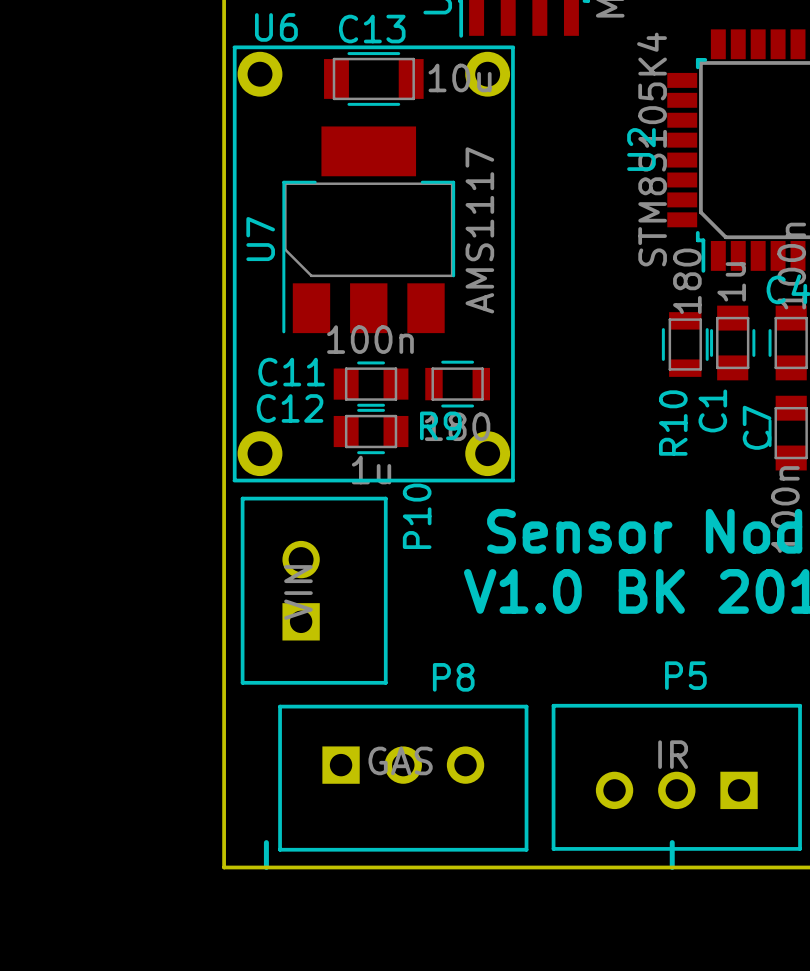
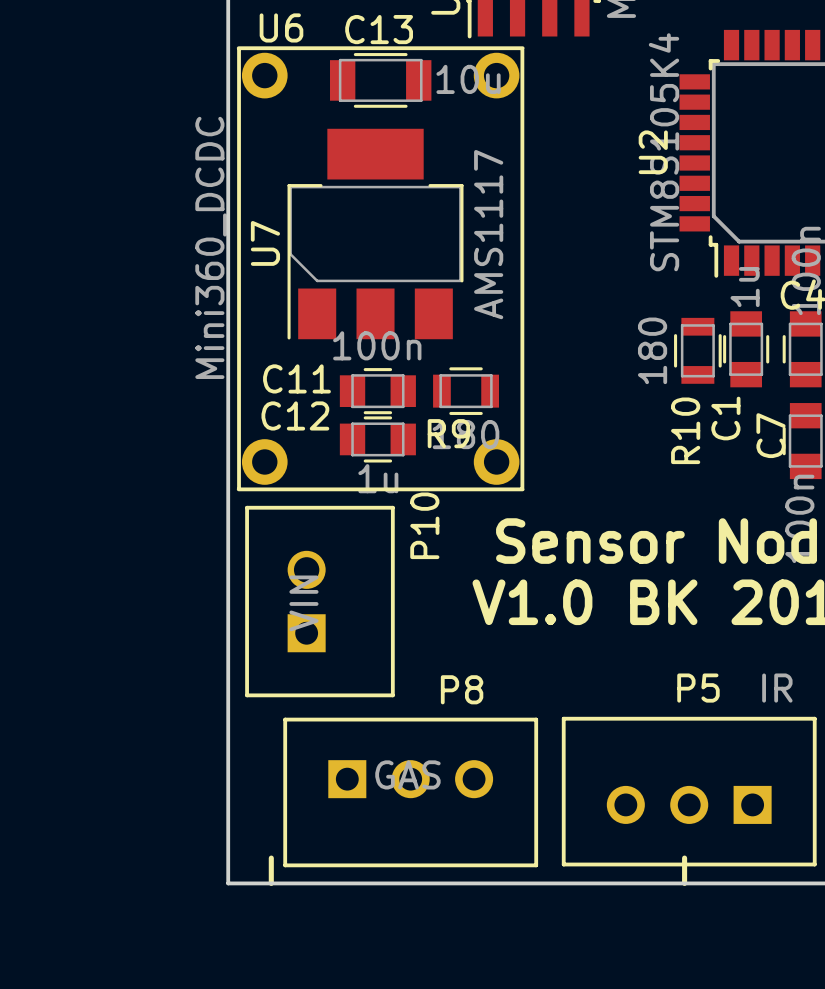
U6 value: none -> Mini360_DCDC (211, 247)
R10 value position: 180 (687, 281) -> 180 (652, 350)
P5 value position: IR (673, 754) -> IR (777, 688)

